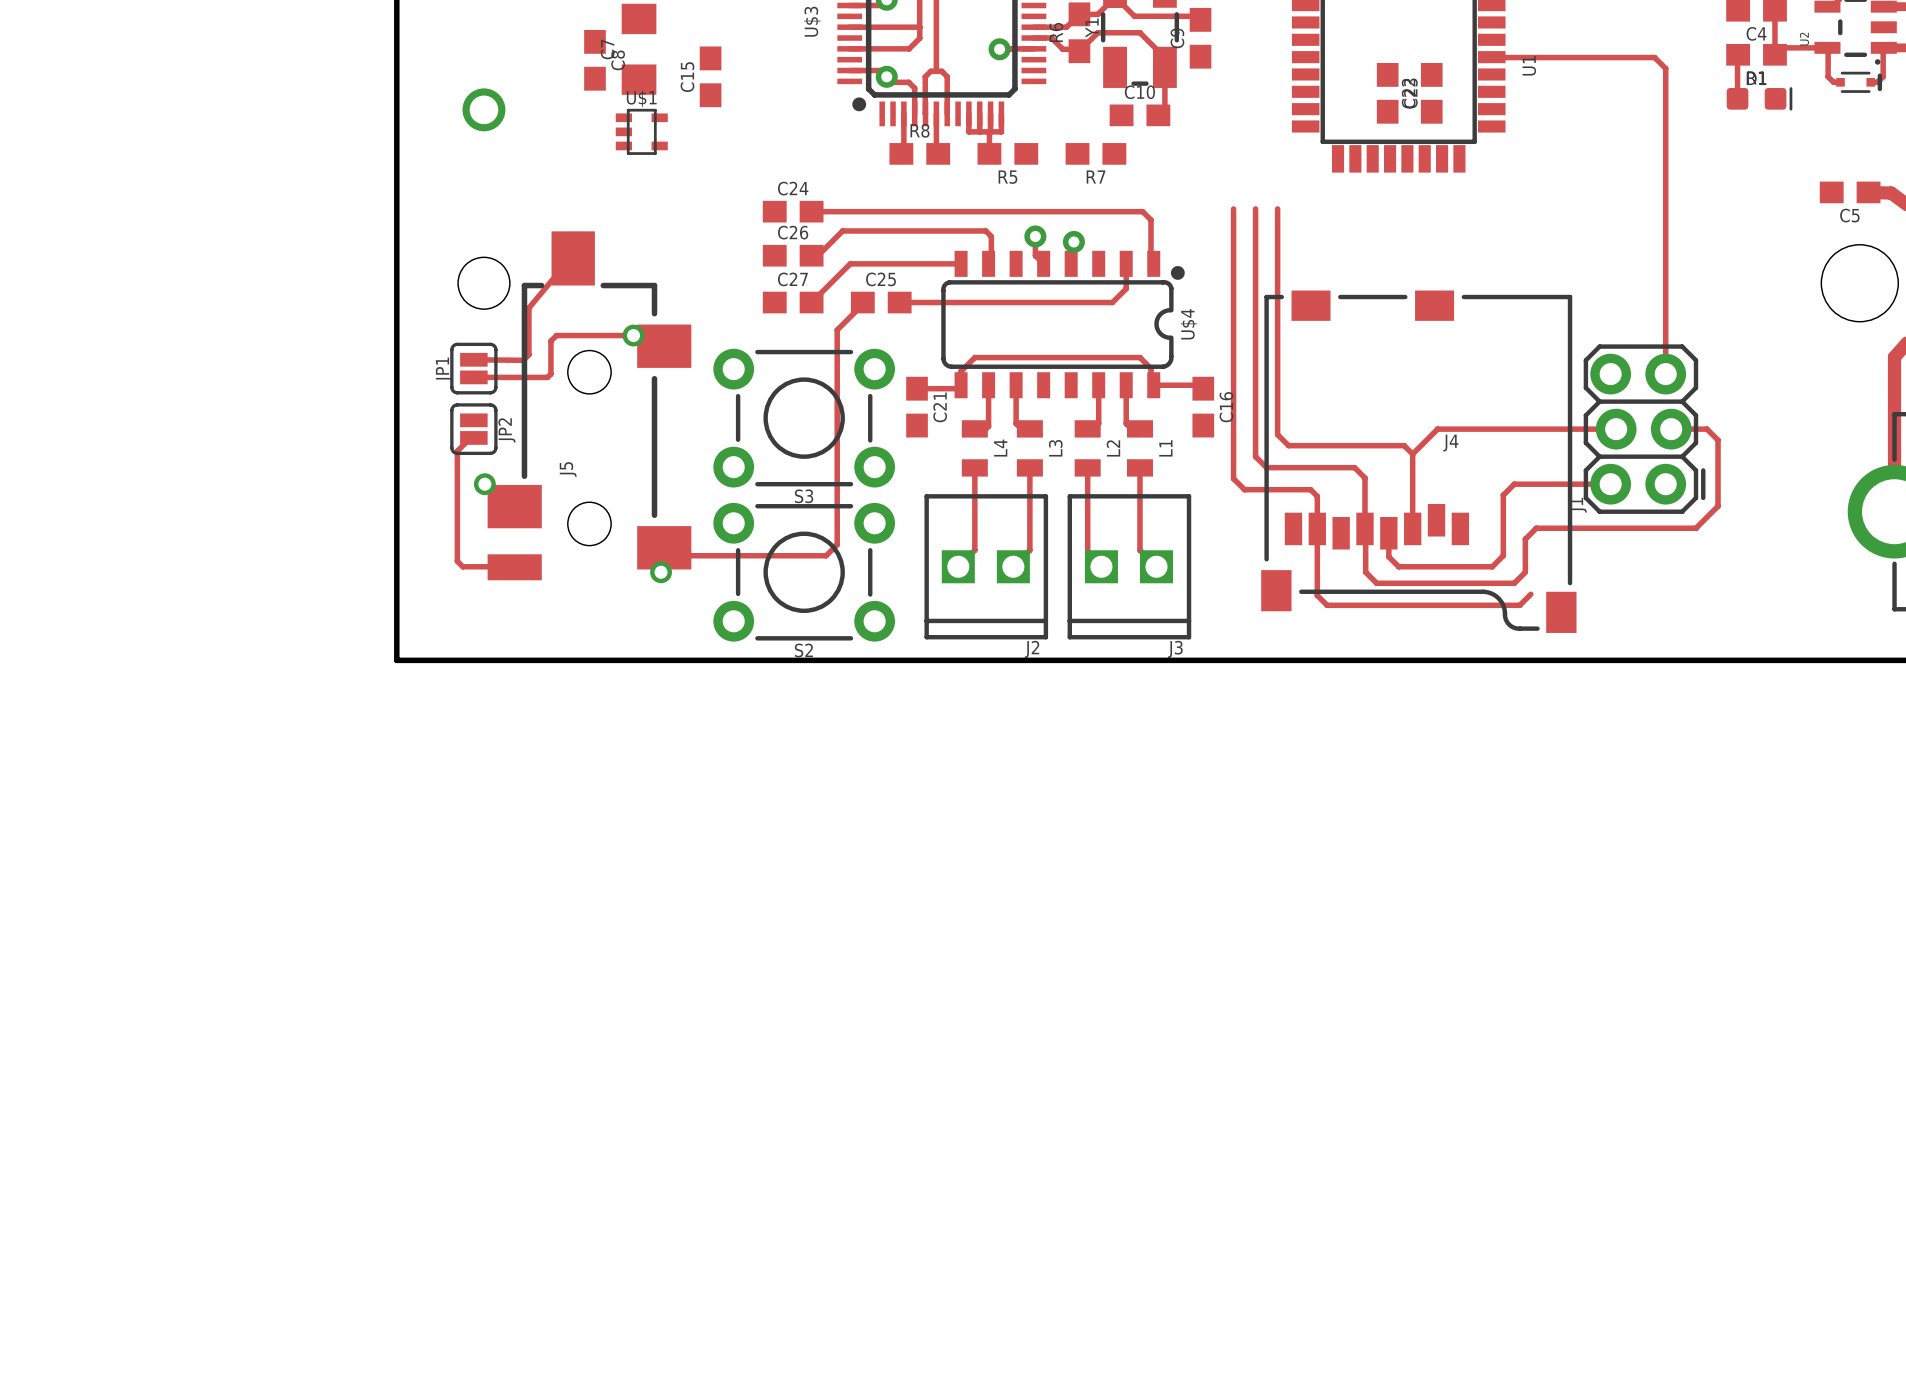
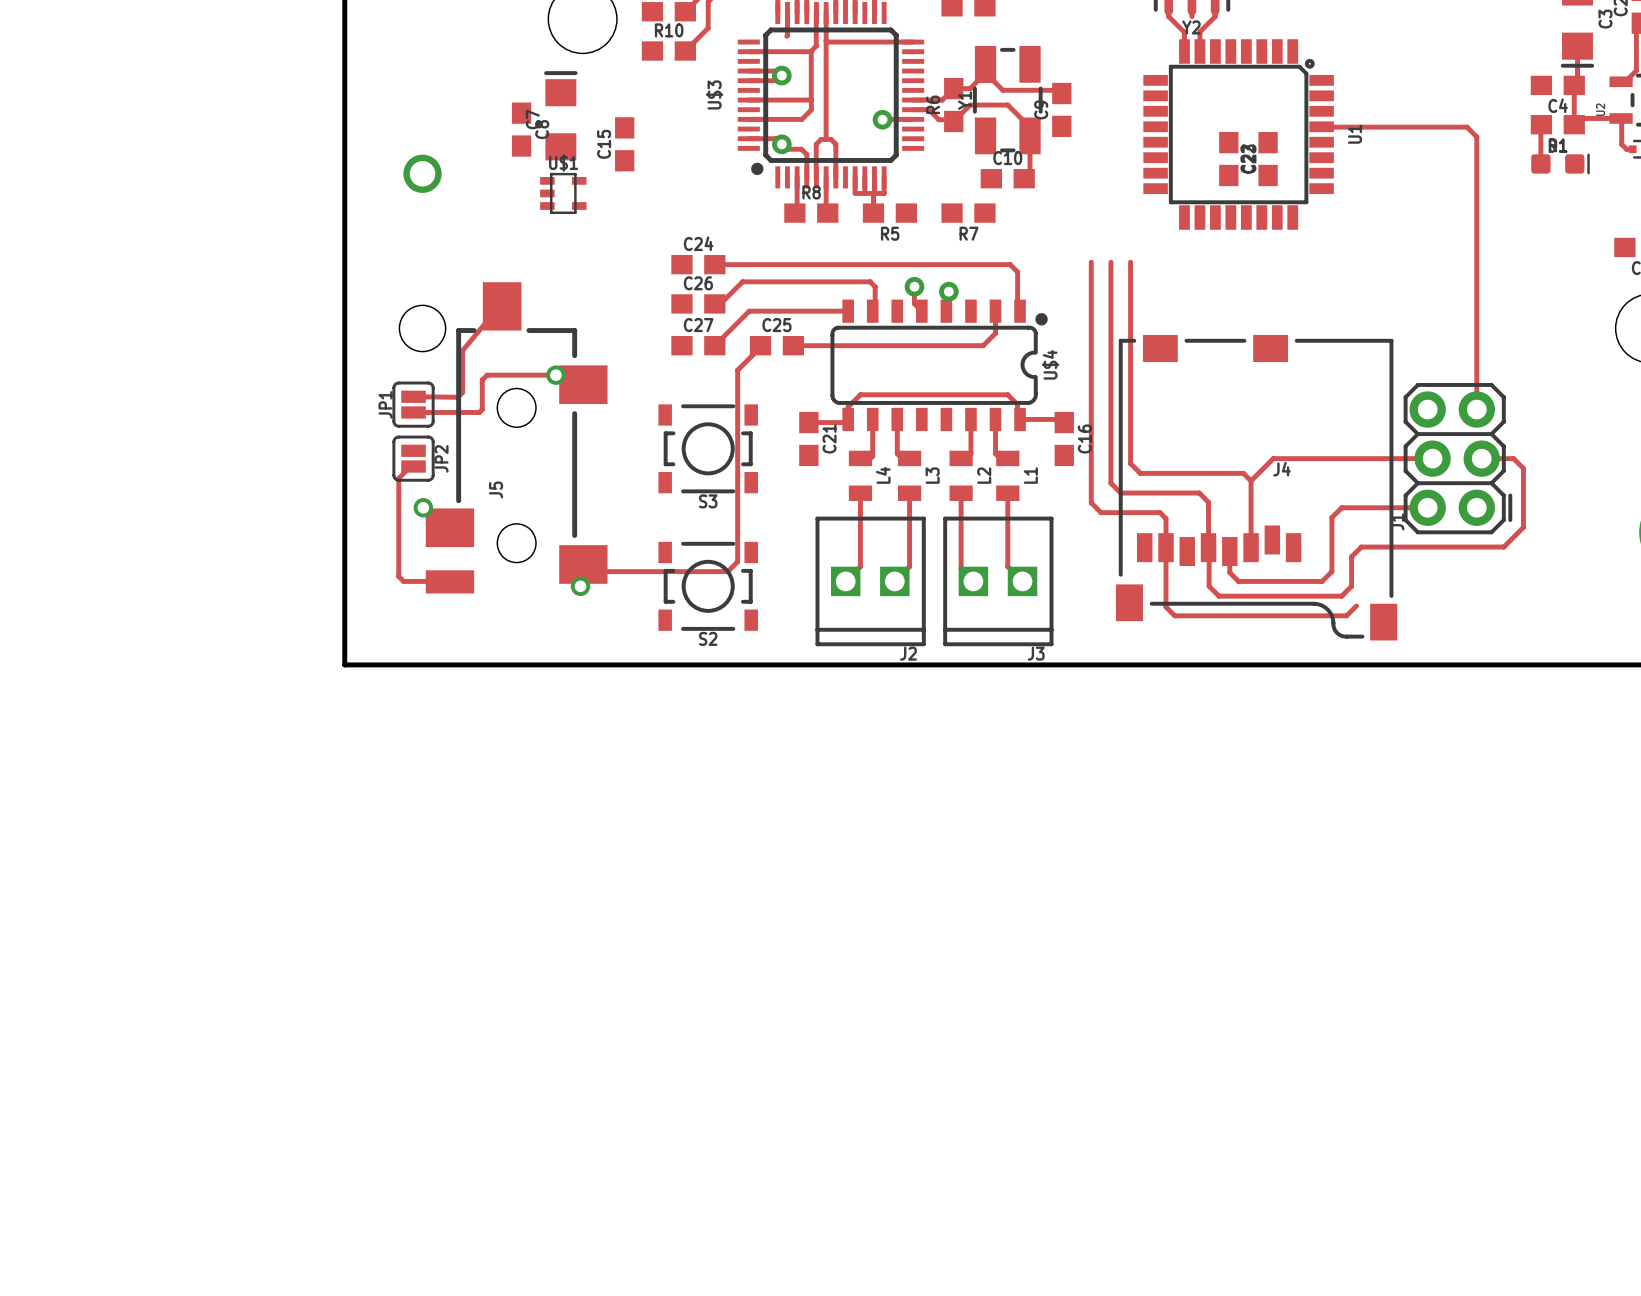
S3 footprint: [713, 348, 896, 488] -> [658, 404, 758, 494]
S2 footprint: [713, 502, 896, 642] -> [658, 541, 758, 631]

